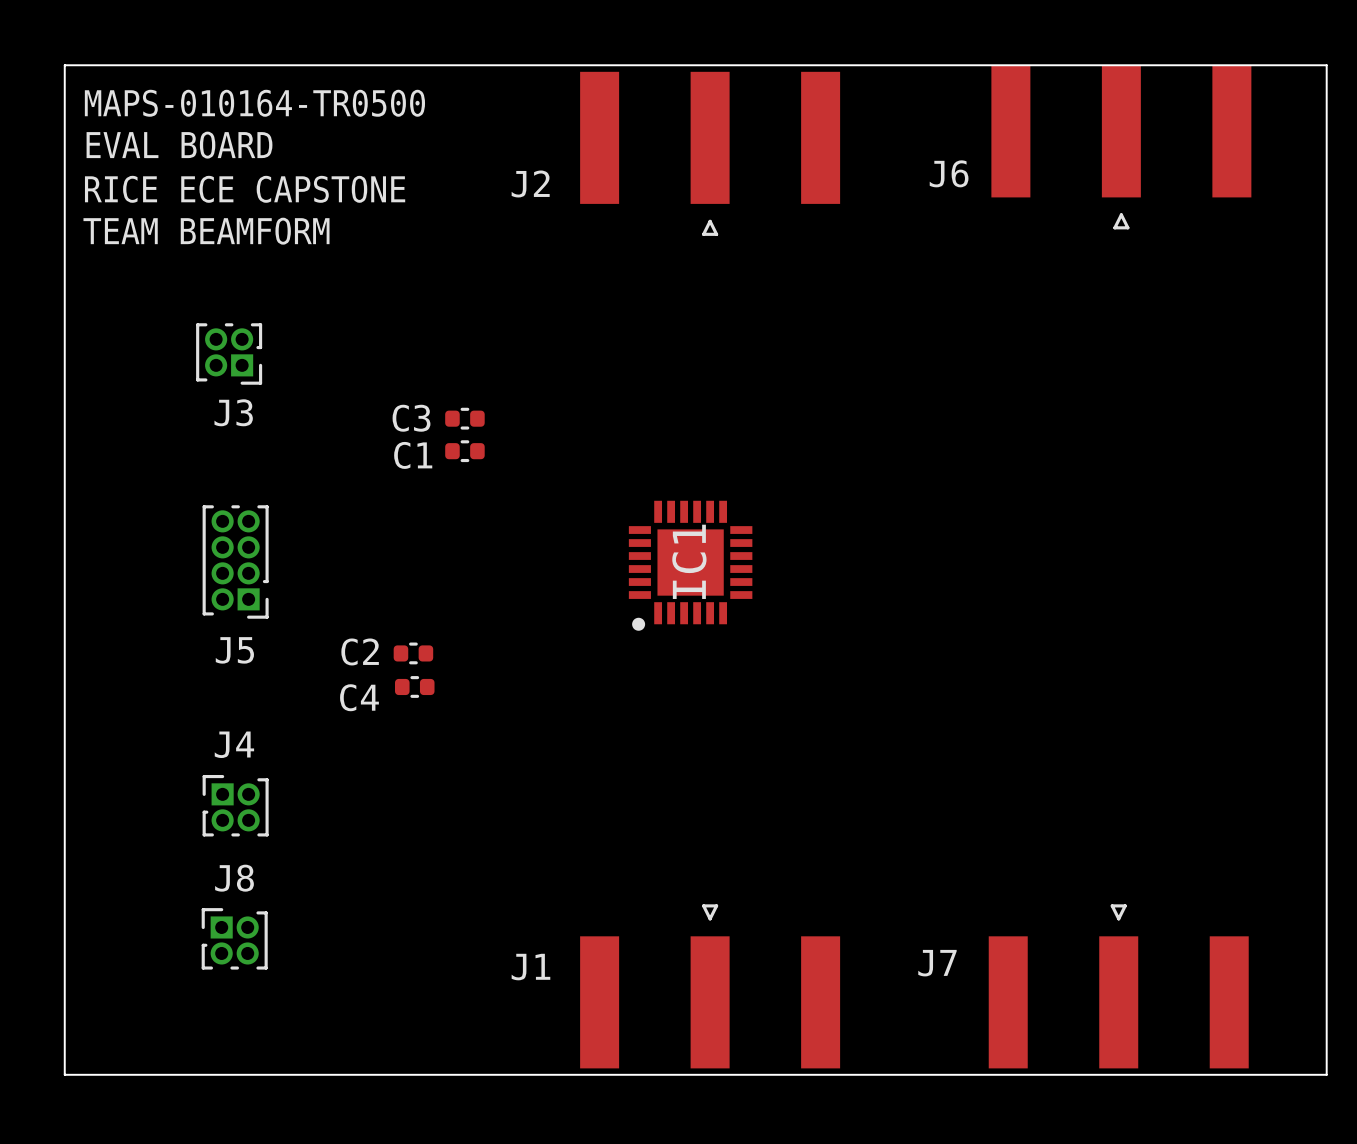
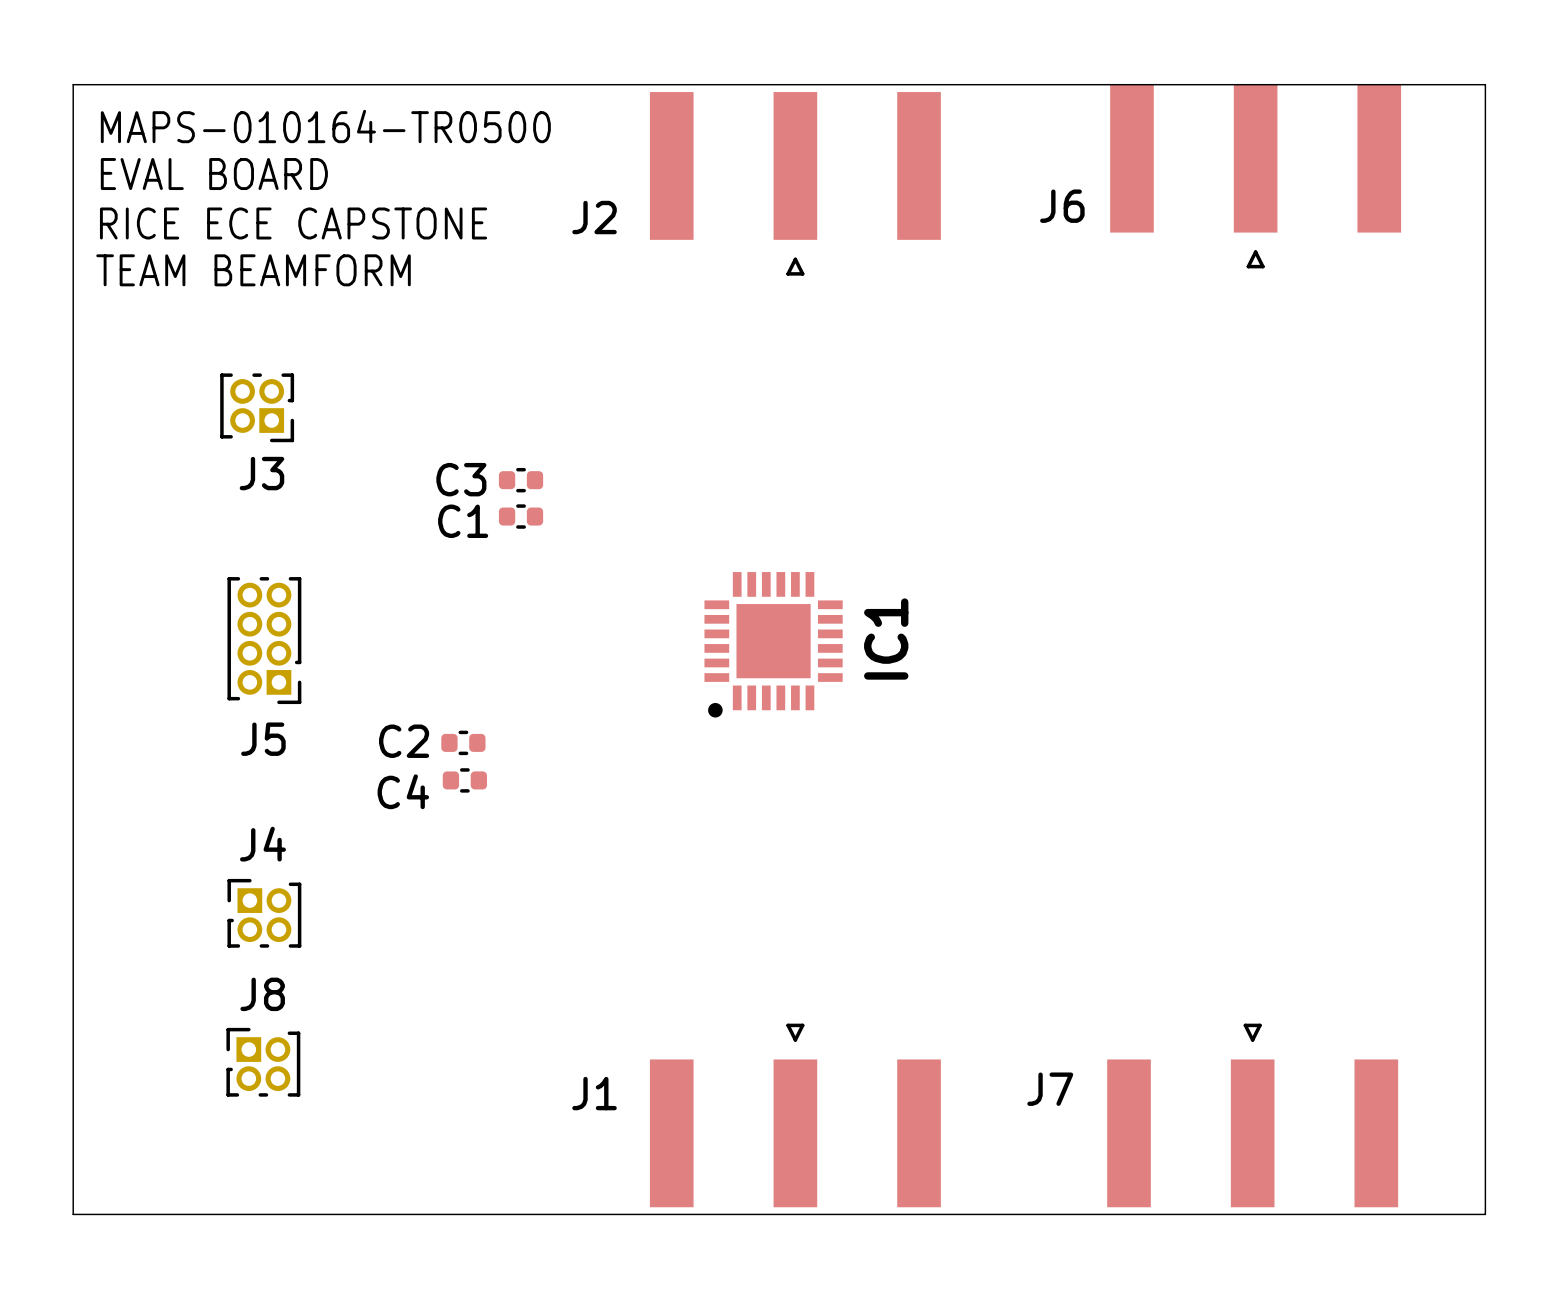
IC1 name position: IC1 (689, 561) -> IC1 (886, 639)

